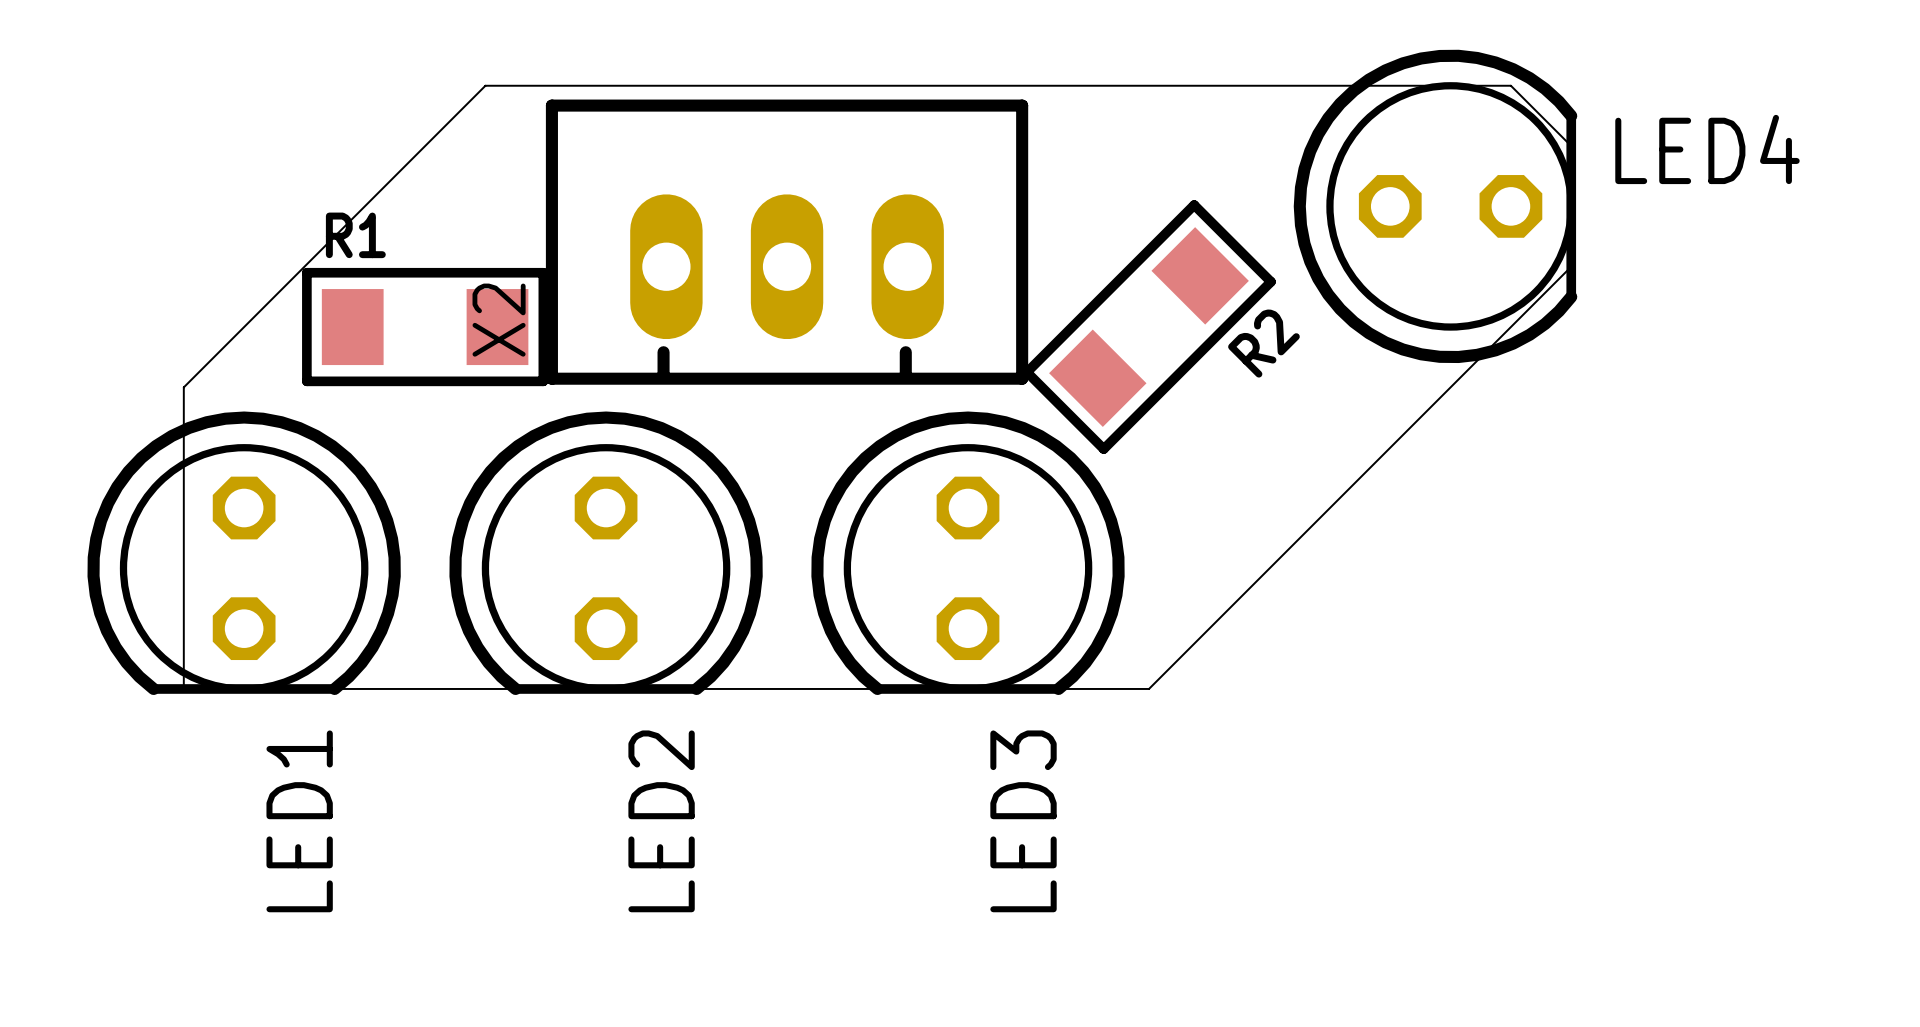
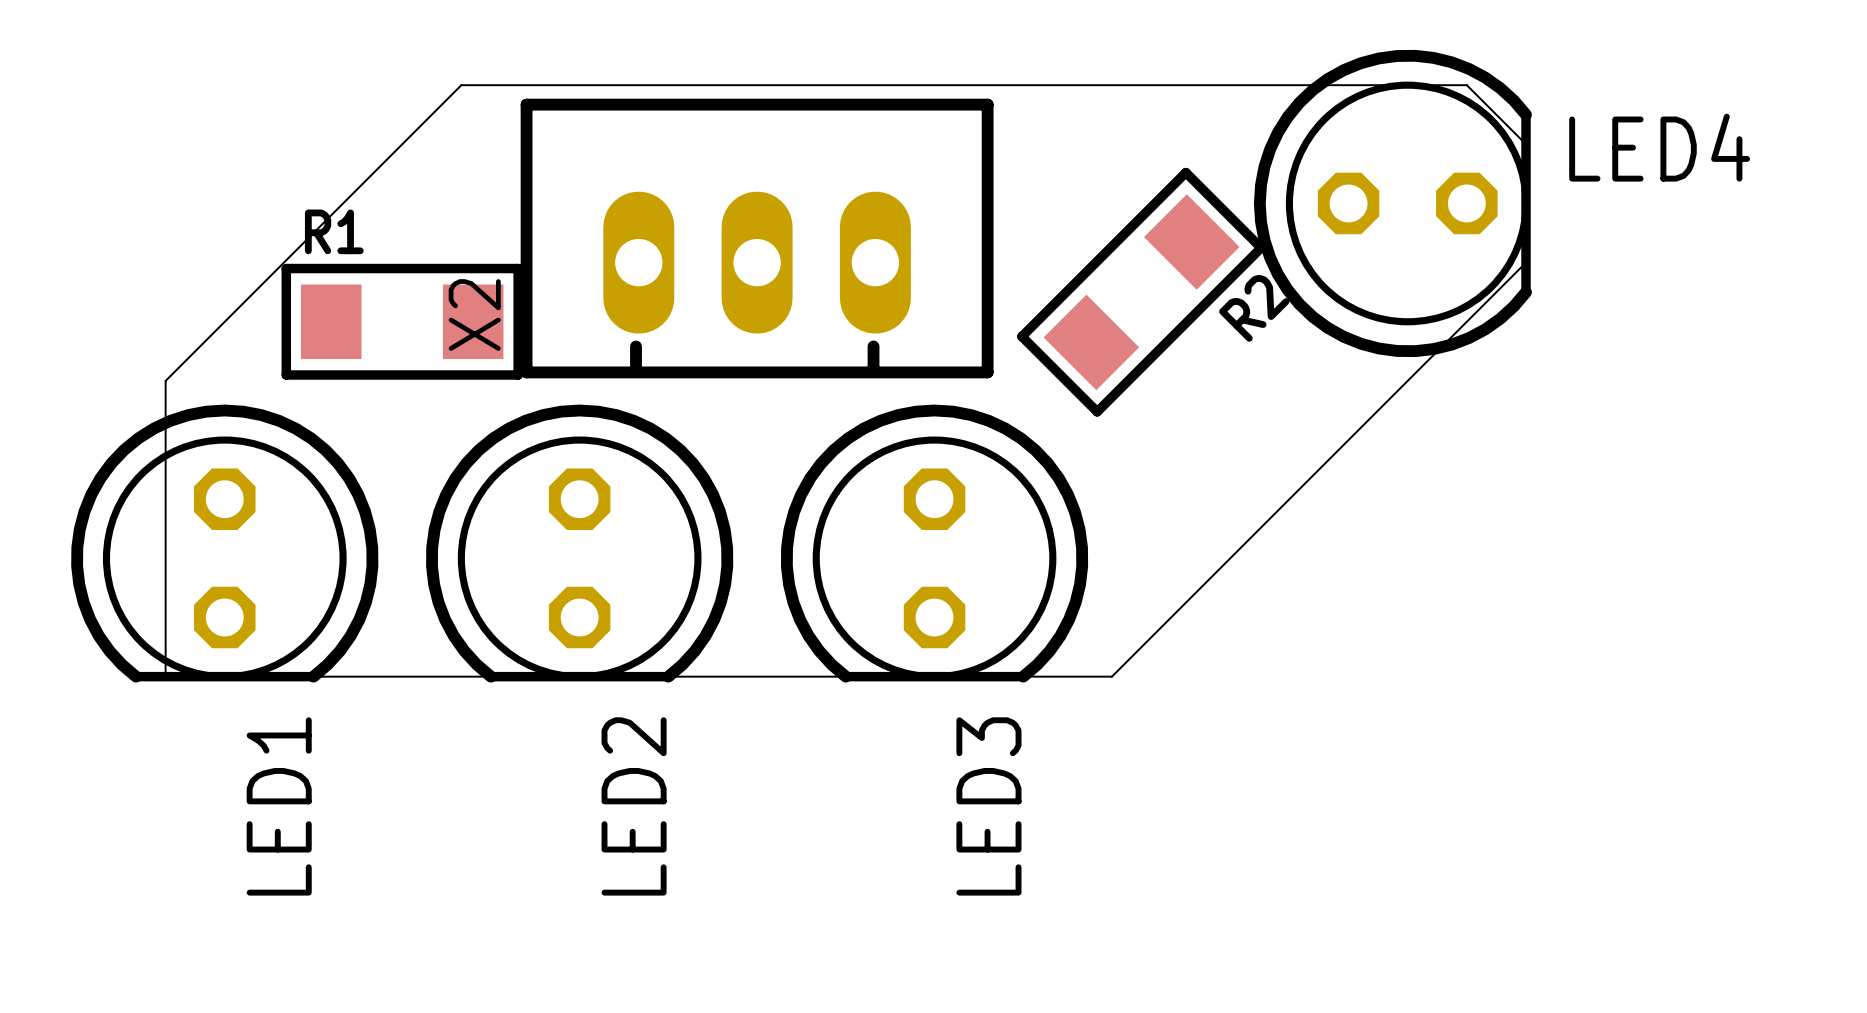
R2 position: (1148, 327) -> (1141, 292)

